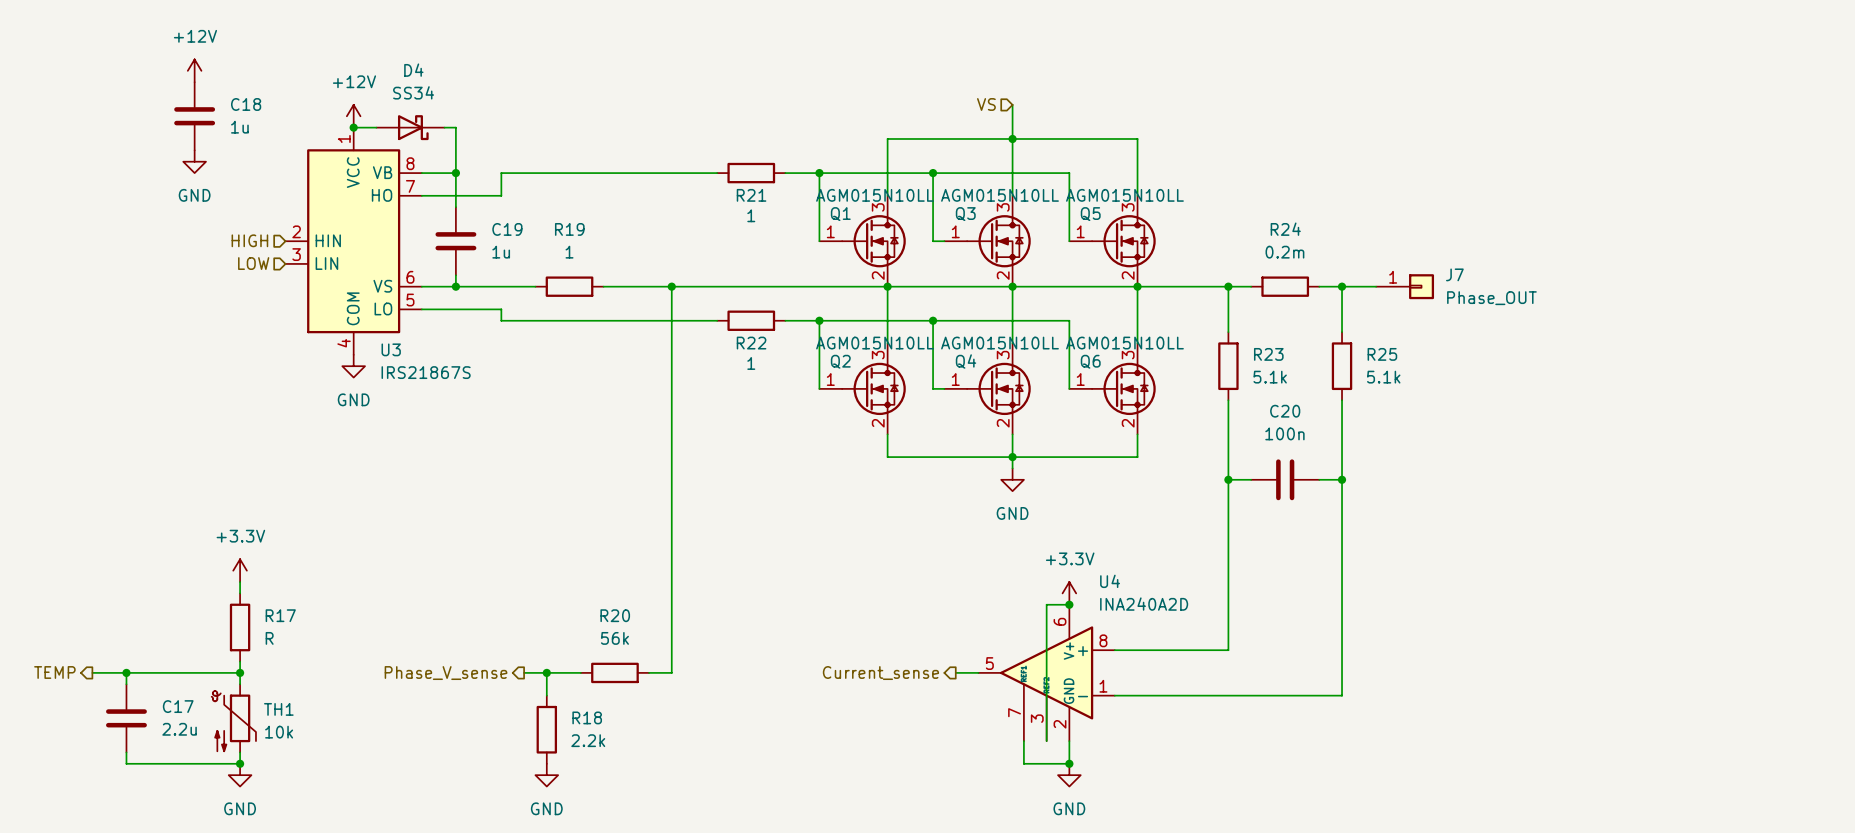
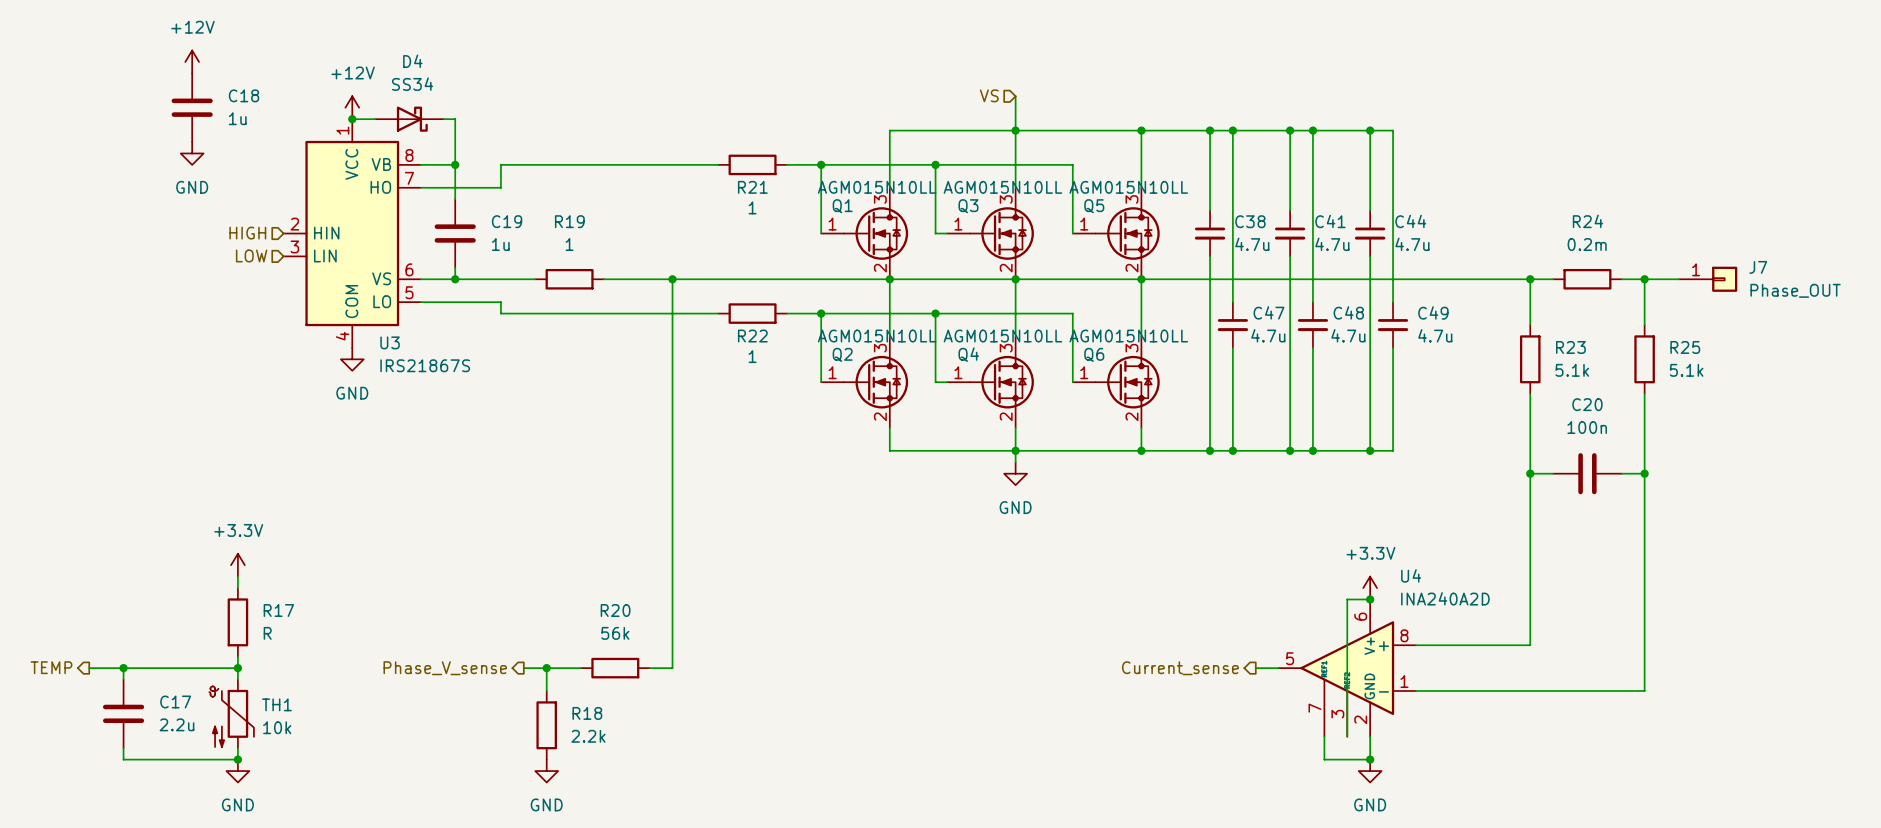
wire: none -> (1141, 130) (1393, 130) (1393, 302)
junction: none -> (1141, 130)
wire: none -> (1210, 130) (1210, 210)
junction: none -> (1210, 130)
wire: none -> (1232, 130) (1232, 279)
junction: none -> (1232, 130)
wire: none -> (1290, 130) (1290, 210)
junction: none -> (1290, 130)
wire: none -> (1312, 130) (1312, 302)
junction: none -> (1312, 130)
wire: none -> (1370, 130) (1370, 210)
junction: none -> (1370, 130)
C38: none -> 4.7u (1210, 233)
C41: none -> 4.7u (1290, 233)
C44: none -> 4.7u (1370, 233)
wire: none -> (1210, 256) (1210, 450)
wire: none -> (1290, 256) (1290, 450)
wire: none -> (1370, 256) (1370, 450)
junction: (1228, 286) -> none
wire: none -> (1255, 279) (1324, 279)
R24 position: (1285, 286) -> (1587, 279)
wire: (1342, 286) (1342, 332) -> (1232, 347) (1232, 393)
junction: (1342, 286) -> none
wire: none -> (1381, 279) (1553, 279)
J7 position: (1405, 286) -> (1708, 279)
wire: none -> (1530, 279) (1530, 325)
junction: none -> (1530, 279)
wire: none -> (1621, 279) (1678, 279)
wire: none -> (1644, 279) (1644, 325)
junction: none -> (1644, 279)
C47: none -> 4.7u (1232, 325)
C48: none -> 4.7u (1312, 325)
C49: none -> 4.7u (1393, 325)
wire: none -> (1312, 347) (1312, 450)
wire: none -> (1393, 347) (1393, 450) (1141, 450)
R23 position: (1228, 366) -> (1530, 359)
R25 position: (1342, 366) -> (1644, 359)
wire: (1342, 400) (1342, 604) -> (1370, 599) (1347, 599)
wire: none -> (1530, 393) (1530, 645) (1415, 645)
wire: none -> (1644, 393) (1644, 690) (1415, 690)
junction: none -> (1141, 450)
junction: none -> (1210, 450)
wire: (1228, 457) (1228, 650) (1114, 650) -> none
junction: none -> (1232, 450)
junction: none -> (1290, 450)
junction: none -> (1312, 450)
junction: none -> (1370, 450)
wire: (1228, 479) (1251, 479) -> (1255, 668) (1278, 668)
junction: (1228, 479) -> none
C20 position: (1285, 479) -> (1587, 473)
wire: (1319, 479) (1342, 479) -> (1530, 473) (1553, 473)
junction: (1342, 479) -> none
junction: none -> (1530, 473)
wire: none -> (1621, 473) (1644, 473)
junction: none -> (1644, 473)
power symbol: +3.3V (1069, 593) -> none
power symbol: none -> +3.3V (1370, 588)
wire: (1069, 604) (1046, 604) (1046, 741) -> none
junction: (1069, 604) -> none
junction: none -> (1370, 599)
wire: (955, 672) (978, 672) -> none
U4 position: (1046, 672) -> (1347, 668)
hierarchical label: Current_sense (880, 673) -> none
hierarchical label: none -> Current_sense (1180, 668)
wire: (1114, 695) (1342, 695) -> (1347, 736) (1347, 690)
wire: (1023, 741) (1023, 763) (1069, 763) (1069, 741) -> none
wire: none -> (1324, 736) (1324, 759) (1370, 759) (1370, 736)
junction: (1069, 763) -> none
junction: none -> (1370, 759)
power symbol: GND (1069, 775) -> none
power symbol: none -> GND (1370, 771)

